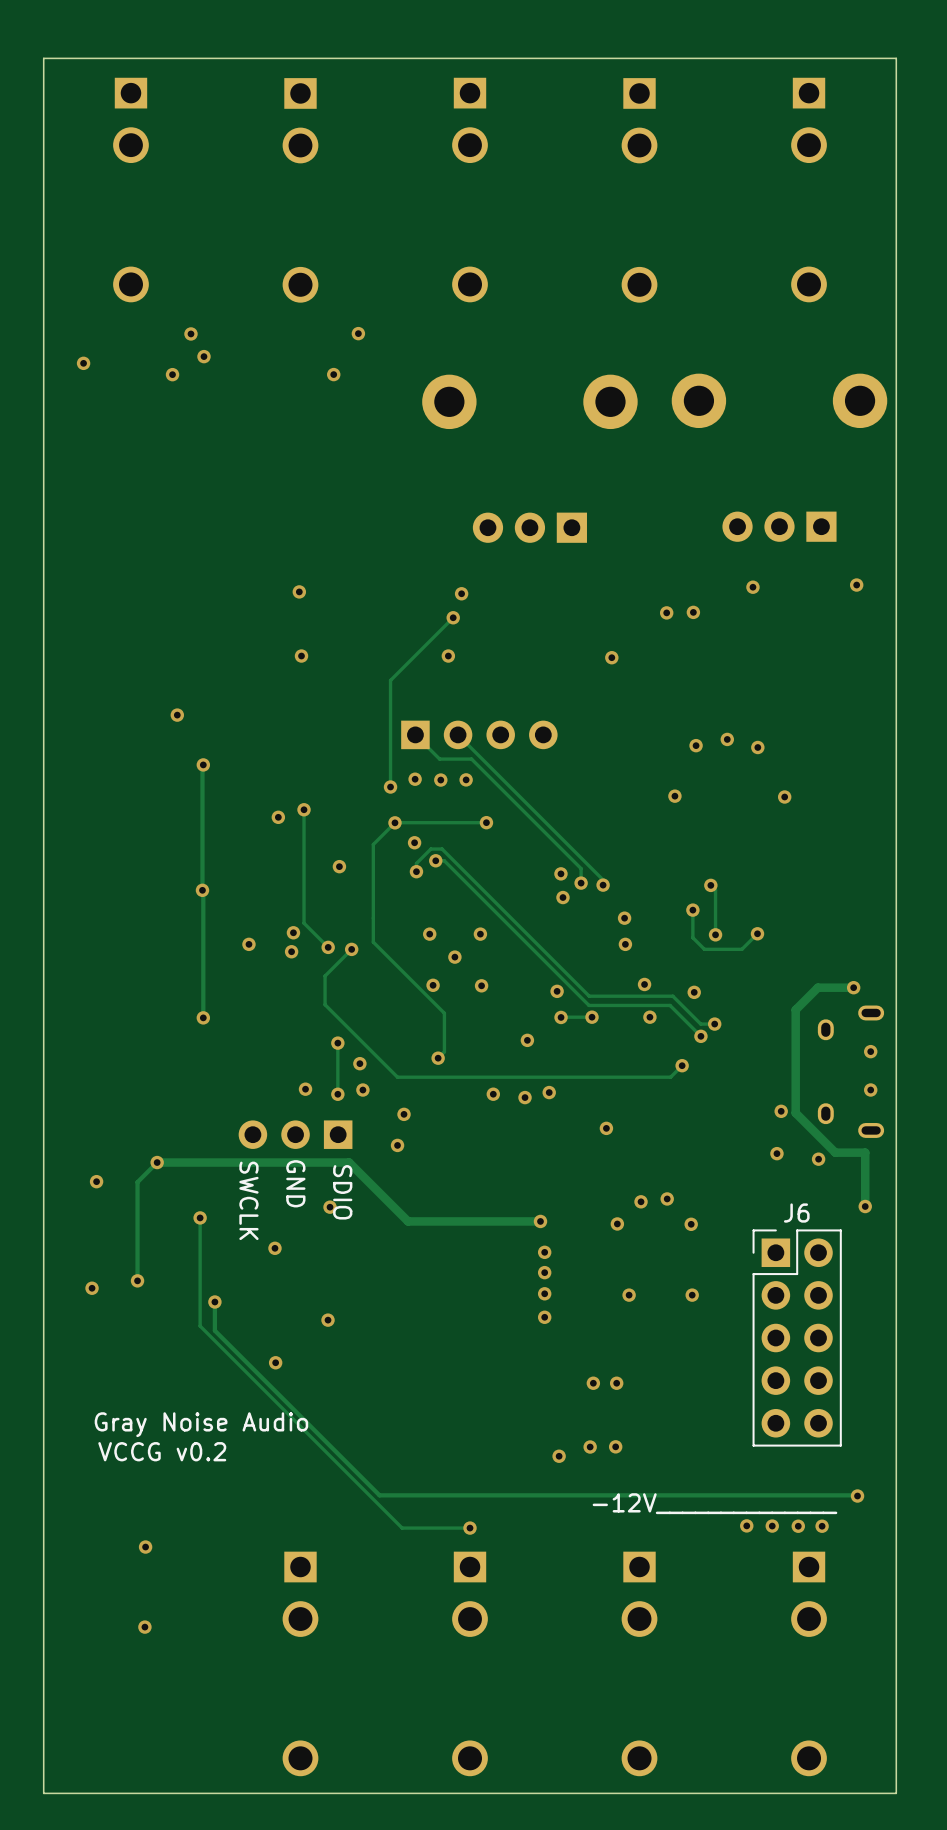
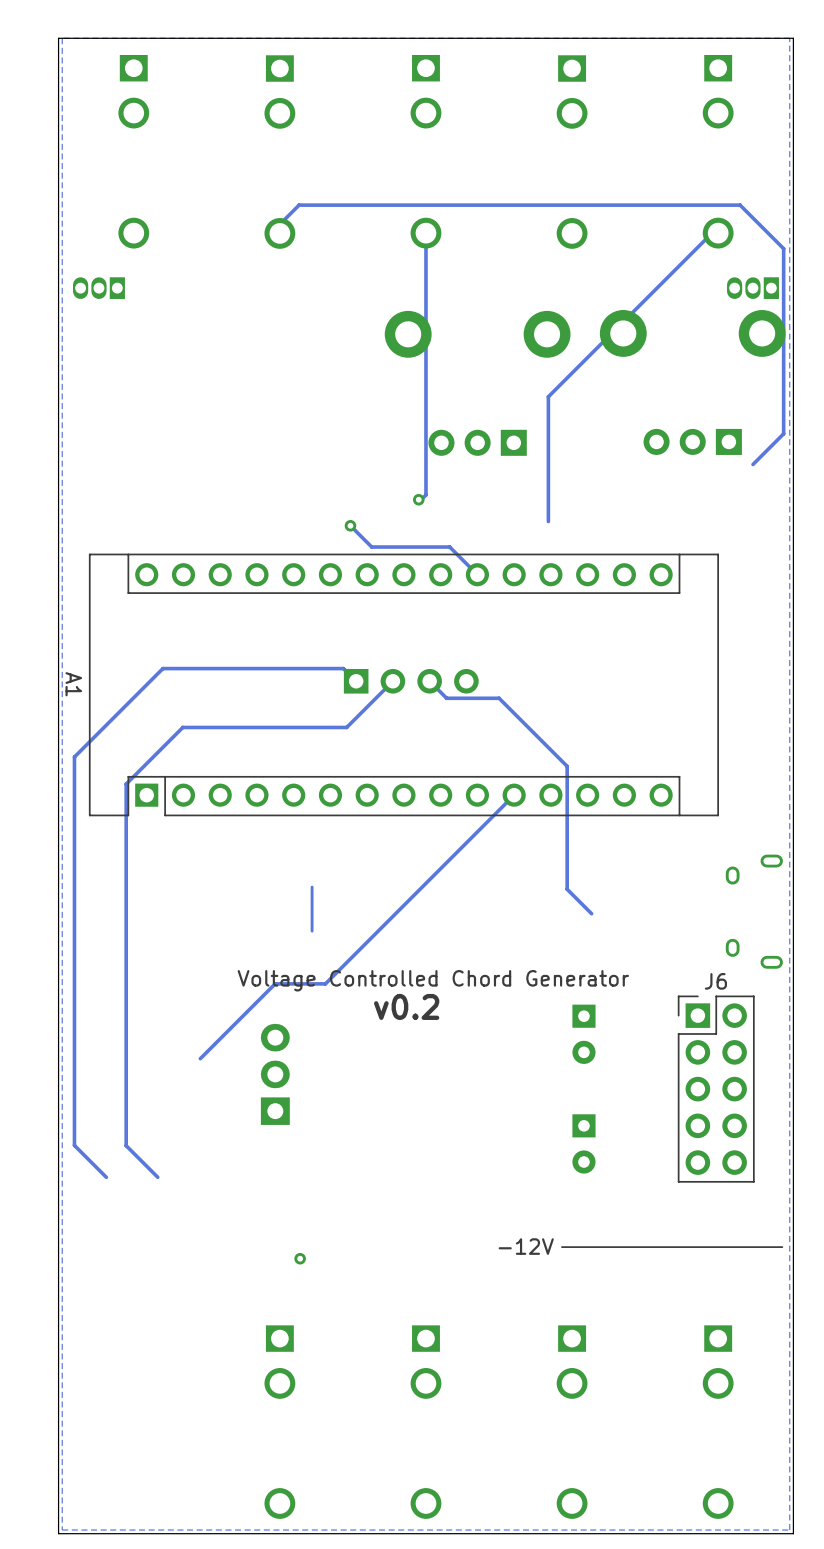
zone outline: none -> (789, 38) (789, 1530) (62, 1530) (62, 38) (789, 38)
track: none -> (279, 225) (299, 205) (740, 205) (783, 248) (783, 433) (752, 464)
track: none -> (425, 225) (425, 494) (418, 502)
track: none -> (719, 225) (548, 396) (548, 521)
via: (190, 333) -> none
via: (358, 333) -> none
part: none -> (98, 288)
part: none -> (752, 288)
via: (203, 356) -> none
via: (83, 363) -> none
via: (172, 374) -> none
via: (333, 374) -> none
via: (856, 585) -> none
via: (752, 587) -> none
via: (299, 591) -> none
via: (666, 612) -> none
via: (693, 612) -> none
track: (453, 617) (390, 680) (390, 787) -> none
via: (453, 617) -> none
track: none -> (350, 525) (371, 547) (449, 547) (477, 574)
via: none -> (350, 525)
via: (301, 656) -> none
via: (448, 656) -> none
via: (611, 657) -> none
via: (177, 715) -> none
track: (415, 734) (439, 759) (471, 759) (581, 868) (581, 883) -> none
track: (458, 734) (603, 879) (603, 885) -> none
part position: (479, 734) -> (411, 681)
via: (727, 739) -> none
via: (696, 745) -> none
via: (757, 747) -> none
track: (203, 764) (203, 1017) -> none
via: (203, 764) -> none
via: (415, 779) -> none
via: (466, 779) -> none
via: (440, 780) -> none
via: (390, 787) -> none
via: (674, 796) -> none
via: (784, 797) -> none
track: none -> (356, 681) (343, 668) (162, 668) (74, 757) (74, 1145) (106, 1177)
track: none -> (392, 681) (346, 727) (182, 727) (126, 784) (126, 1145) (157, 1177)
track: none -> (429, 681) (446, 698) (499, 698) (567, 766) (567, 889) (591, 913)
A1: none -> (403, 684)
track: (304, 809) (304, 923) (328, 947) -> none
via: (304, 809) -> none
via: (278, 817) -> none
via: (394, 822) -> none
track: (486, 822) (395, 822) (373, 844) (373, 942) (444, 1013) (444, 1051) (438, 1058) -> none
via: (486, 822) -> none
via: (414, 842) -> none
track: (435, 860) (444, 860) (589, 1005) (670, 1005) (700, 1036) -> none
via: (435, 860) -> none
via: (339, 866) -> none
track: (416, 871) (416, 863) (430, 849) (442, 849) (589, 996) (672, 996) (700, 1024) (714, 1024) -> none
via: (416, 871) -> none
via: (560, 873) -> none
via: (581, 883) -> none
via: (603, 885) -> none
track: (710, 885) (715, 890) (715, 934) -> none
via: (710, 885) -> none
via: (202, 890) -> none
via: (562, 897) -> none
track: (692, 910) (692, 937) (704, 949) (741, 949) (757, 933) -> none
via: (692, 910) -> none
via: (624, 918) -> none
via: (293, 932) -> none
via: (757, 933) -> none
via: (429, 934) -> none
via: (480, 934) -> none
via: (715, 934) -> none
track: none -> (514, 795) (325, 983) (275, 983) (200, 1058)
via: (248, 944) -> none
via: (625, 944) -> none
via: (328, 947) -> none
track: (351, 949) (325, 976) (325, 1004) (397, 1077) (670, 1077) (682, 1065) -> none
via: (351, 949) -> none
via: (291, 951) -> none
via: (454, 957) -> none
via: (644, 984) -> none
via: (433, 985) -> none
via: (481, 985) -> none
track: (853, 987) (817, 987) (795, 1009) (795, 1113) (835, 1152) (865, 1152) (865, 1206) -> none
via: (853, 987) -> none
via: (557, 991) -> none
via: (694, 992) -> none
via: (203, 1017) -> none
via: (561, 1017) -> none
track: (592, 1017) (561, 1017) -> none
via: (592, 1017) -> none
via: (649, 1017) -> none
via: (714, 1024) -> none
via: (700, 1036) -> none
via: (527, 1040) -> none
via: (337, 1043) -> none
via: (870, 1051) -> none
via: (438, 1058) -> none
via: (359, 1063) -> none
via: (682, 1065) -> none
via: (305, 1089) -> none
via: (362, 1090) -> none
via: (870, 1090) -> none
via: (549, 1092) -> none
via: (337, 1094) -> none
via: (493, 1094) -> none
via: (525, 1097) -> none
via: (781, 1111) -> none
via: (404, 1114) -> none
via: (606, 1128) -> none
part: (295, 1134) -> none
via: (397, 1145) -> none
text: none -> Voltage Controlled Chord Generator (433, 980)
via: (776, 1153) -> none
via: (818, 1159) -> none
via: (157, 1162) -> none
via: (96, 1181) -> none
text: none -> v0.2 (406, 1006)
text: GND (295, 1183) -> none
text: SDIO (342, 1192) -> none
via: (667, 1198) -> none
text: SWCLK (248, 1200) -> none
via: (641, 1201) -> none
via: (865, 1206) -> none
via: (330, 1207) -> none
part: none -> (583, 1034)
track: (200, 1217) (200, 1326) (402, 1528) (470, 1528) -> none
via: (200, 1217) -> none
track: (540, 1221) (408, 1221) (349, 1162) (157, 1162) (137, 1182) (137, 1280) -> none
via: (540, 1221) -> none
via: (617, 1223) -> none
via: (691, 1224) -> none
via: (274, 1248) -> none
via: (544, 1252) -> none
part: none -> (275, 1074)
via: (544, 1272) -> none
via: (137, 1280) -> none
via: (92, 1288) -> none
via: (544, 1293) -> none
via: (629, 1295) -> none
via: (692, 1295) -> none
track: (214, 1302) (214, 1330) (379, 1495) (857, 1496) -> none
via: (214, 1302) -> none
via: (544, 1317) -> none
via: (328, 1320) -> none
J6 position: (797, 1338) -> (716, 1089)
part: none -> (583, 1143)
via: (275, 1362) -> none
via: (593, 1383) -> none
via: (616, 1383) -> none
text: Gray Noise Audio (201, 1424) -> none
via: (615, 1446) -> none
via: (590, 1447) -> none
text: VCCG v0.2 (162, 1451) -> none
via: (559, 1456) -> none
text: none -> -12V (526, 1246)
line: none -> (782, 1247) (561, 1247)
via: none -> (300, 1258)
via: (857, 1496) -> none
text: -12V______________ (714, 1503) -> none
via: (746, 1525) -> none
via: (772, 1526) -> none
via: (798, 1526) -> none
via: (822, 1526) -> none
via: (470, 1528) -> none
via: (145, 1547) -> none
via: (144, 1627) -> none

